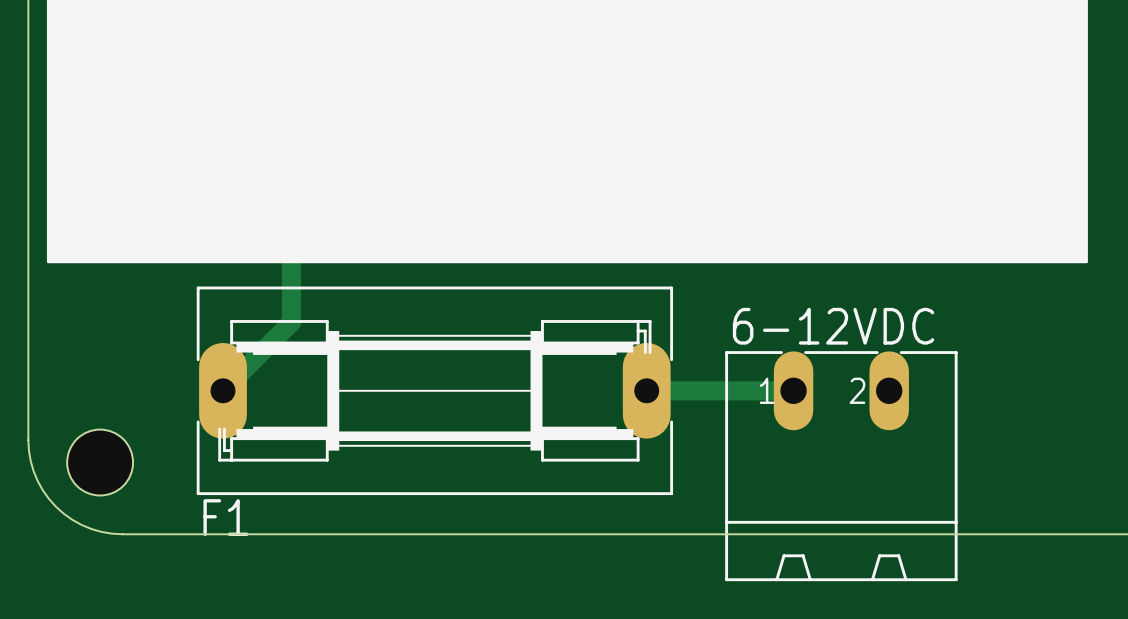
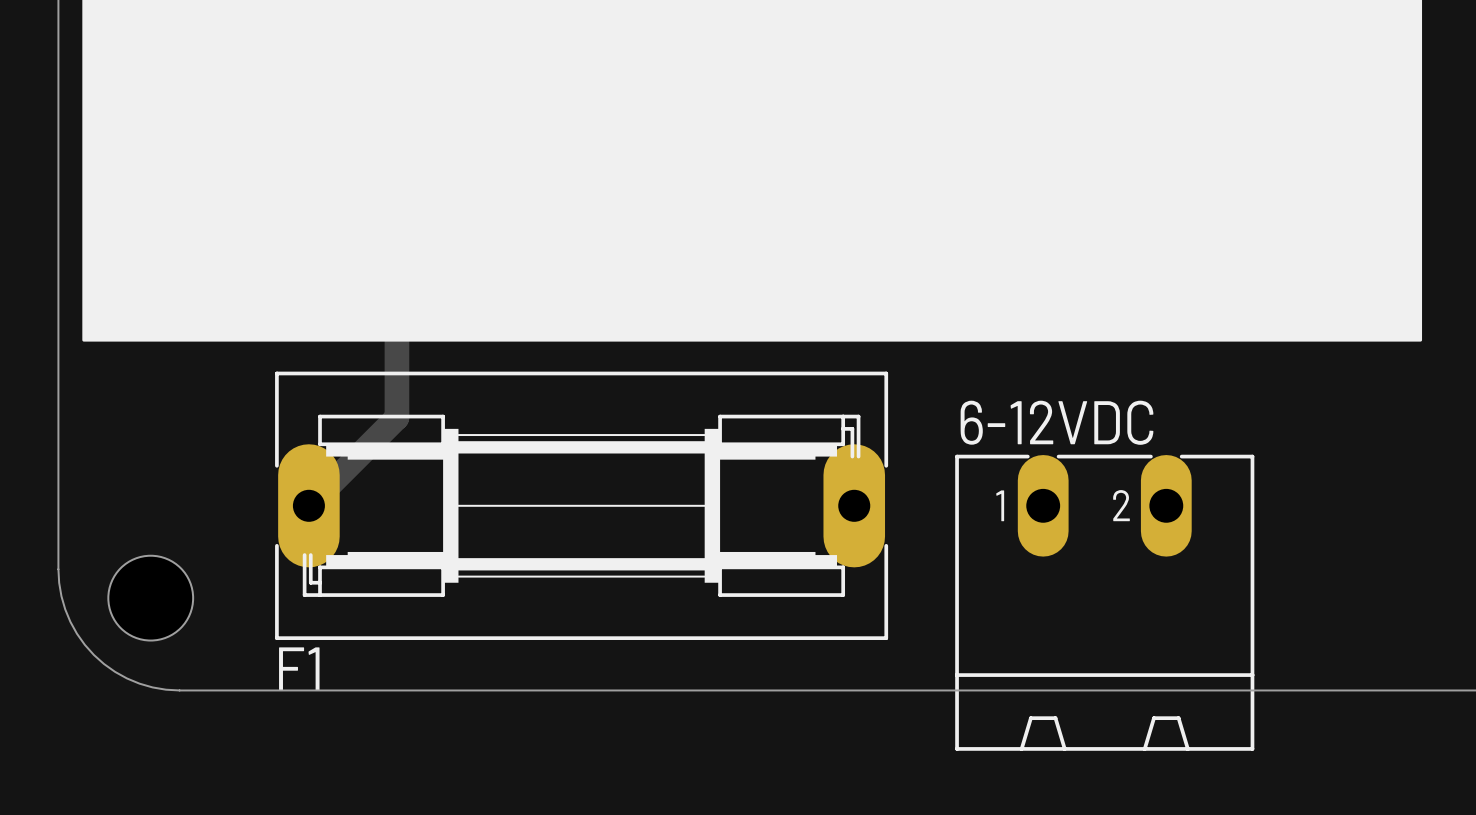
track: (646, 390) (793, 390) -> none

